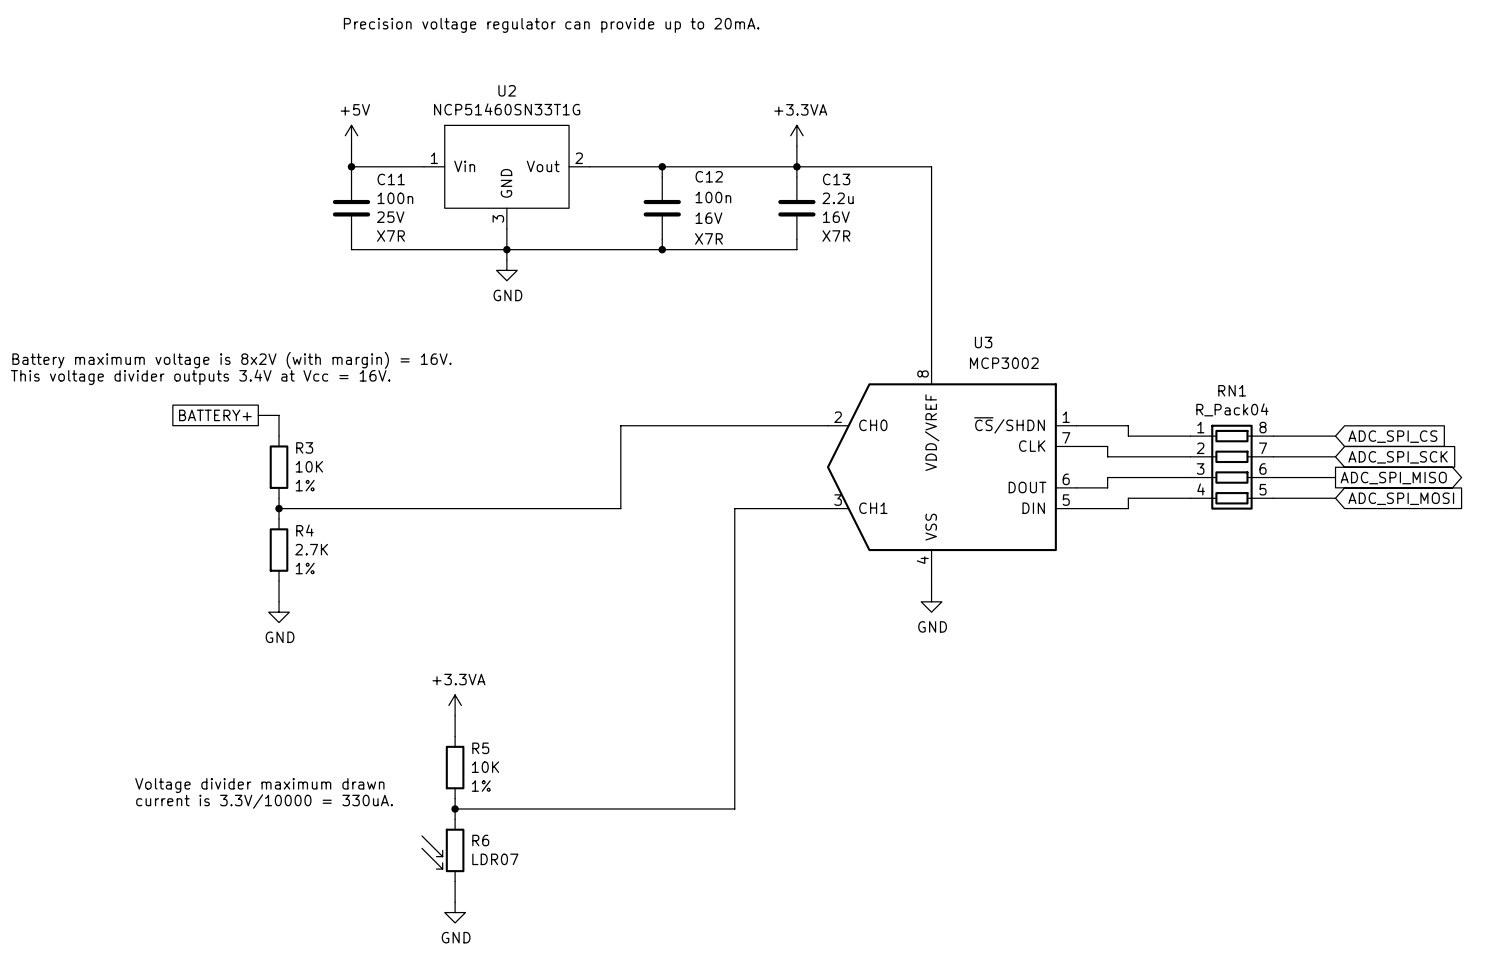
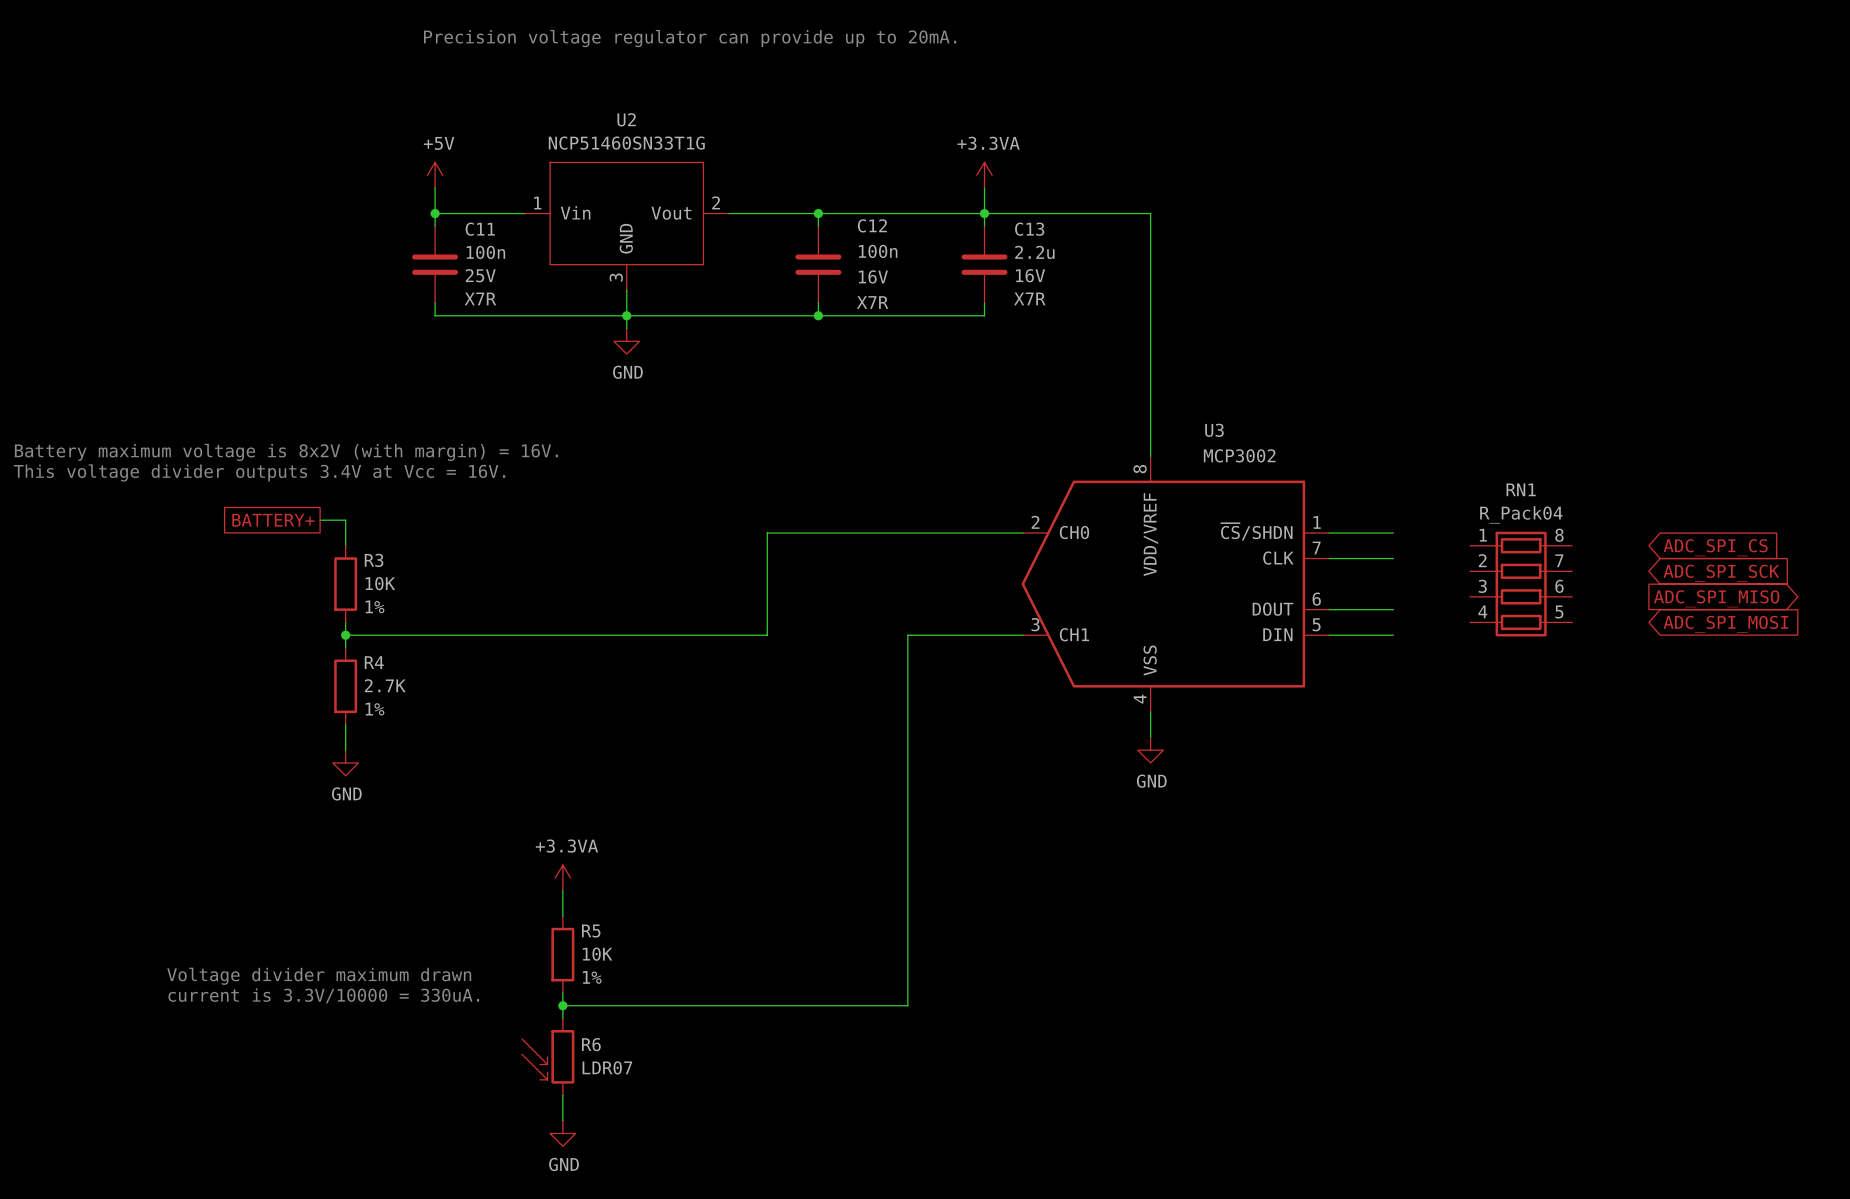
wire: (1128, 425) (1128, 436) (1190, 436) -> none
wire: (1273, 436) (1335, 436) -> none
wire: (1107, 446) (1107, 456) (1190, 456) -> (1367, 558) (1393, 558)
wire: (1273, 456) (1335, 456) -> none
wire: (1190, 477) (1107, 477) (1107, 487) -> (1393, 609) (1367, 609)
wire: (1273, 477) (1335, 477) -> none
wire: (1190, 498) (1128, 498) (1128, 508) -> none
wire: (1273, 498) (1335, 498) -> none

